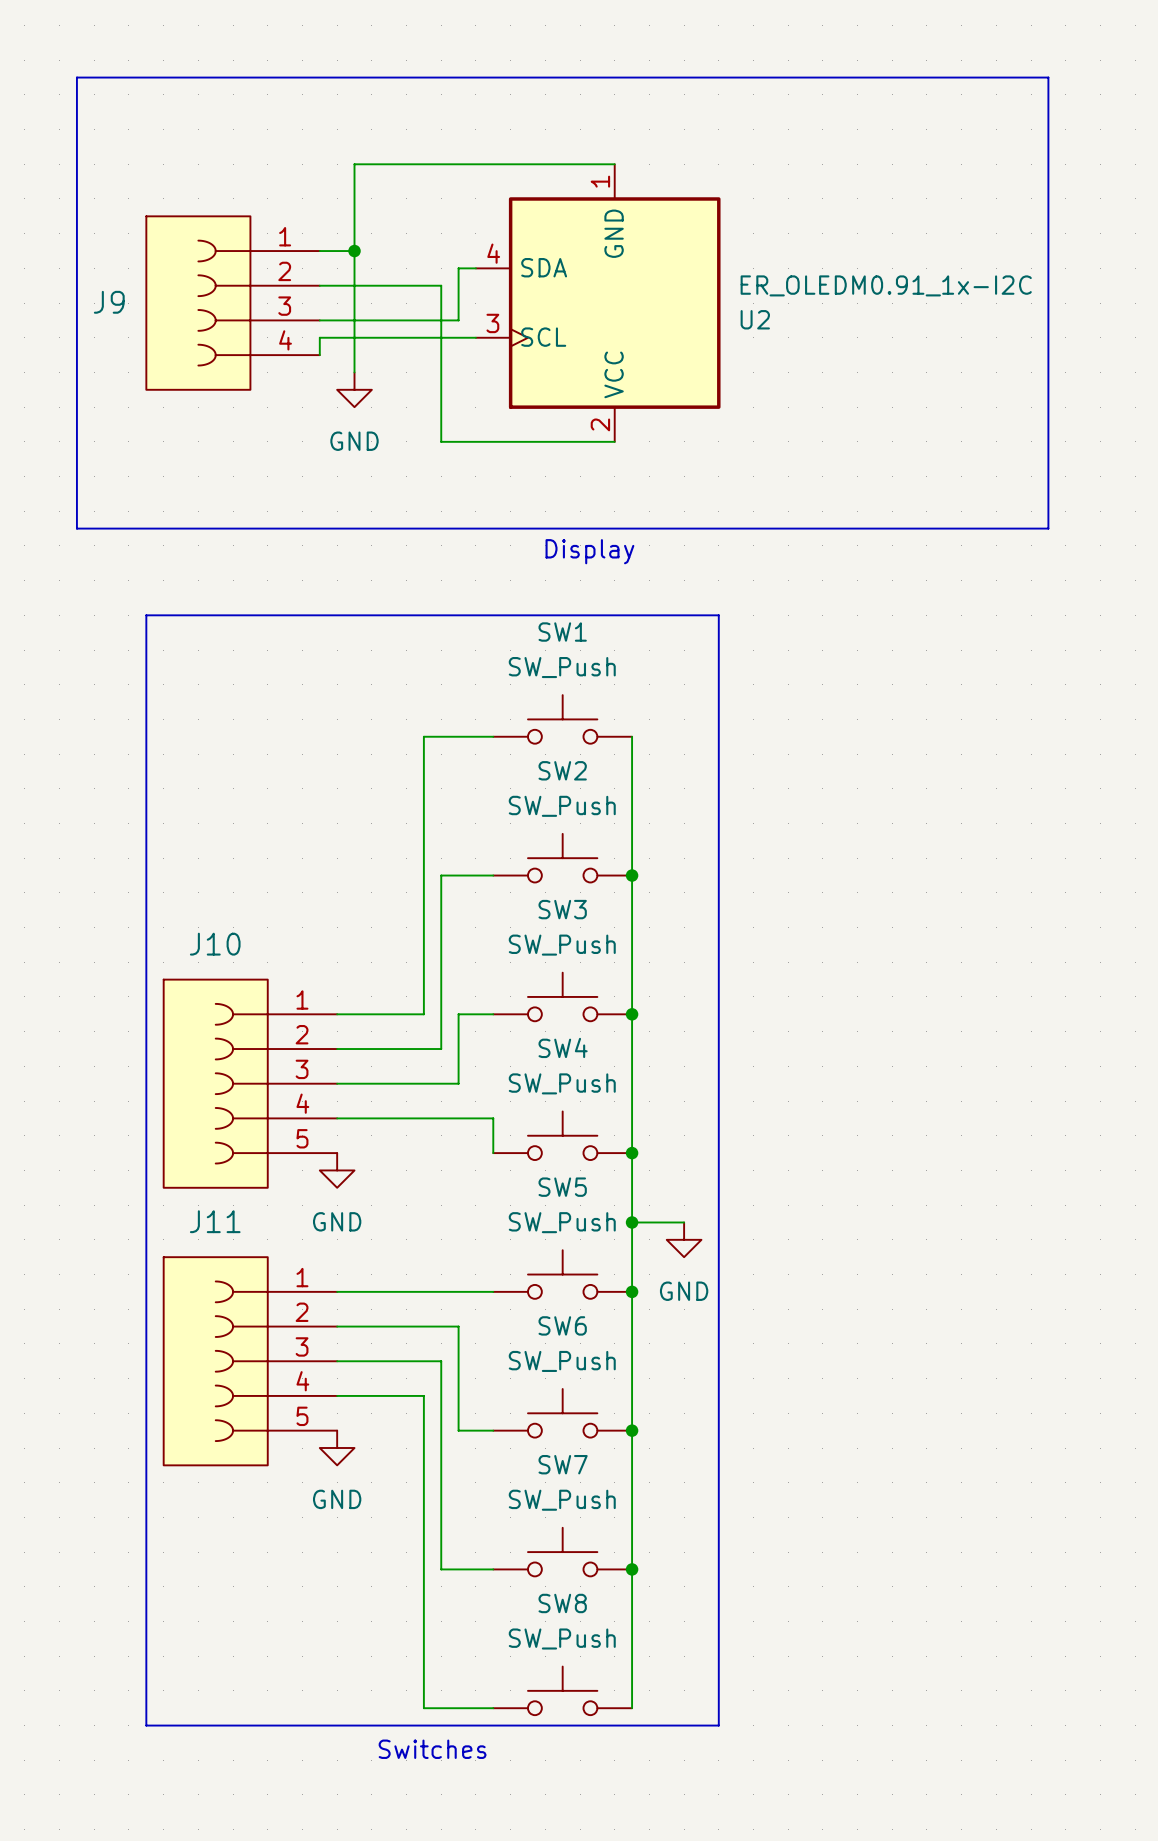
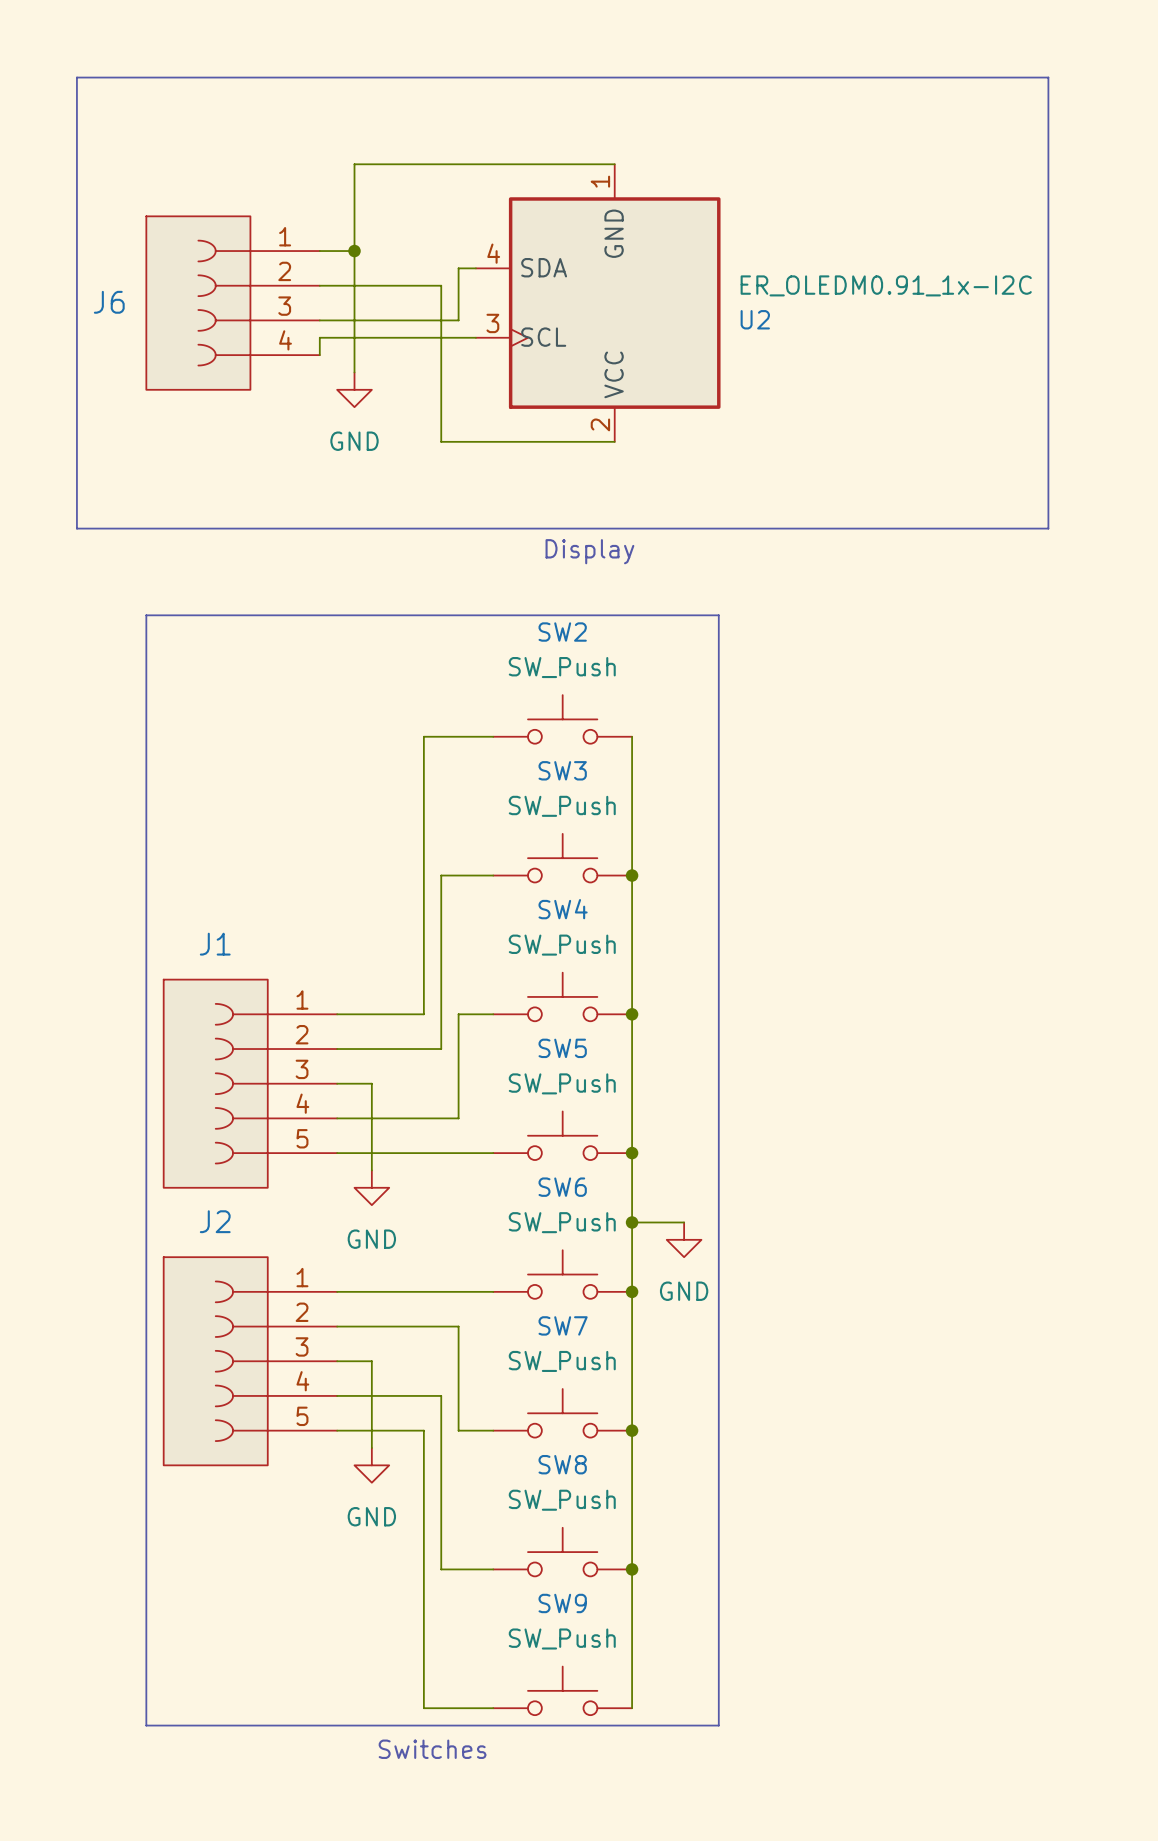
J9 name: J9 (109, 302) -> J6 (109, 302)
SW1 name: SW1 (562, 632) -> SW2 (562, 632)
SW2 name: SW2 (562, 770) -> SW3 (562, 770)
SW3 name: SW3 (562, 909) -> SW4 (563, 909)
J10 name: J10 (215, 944) -> J1 (215, 944)
SW4 name: SW4 (563, 1047) -> SW5 (562, 1048)
wire: (371, 1083) (458, 1083) -> (371, 1083) (371, 1170)
wire: (458, 1118) (493, 1118) (493, 1153) -> (458, 1118) (458, 1083)
wire: none -> (337, 1153) (493, 1153)
power symbol position: GND (337, 1170) -> GND (371, 1187)
SW5 name: SW5 (562, 1187) -> SW6 (562, 1187)
J11 name: J11 (215, 1221) -> J2 (215, 1221)
SW6 name: SW6 (562, 1325) -> SW7 (563, 1325)
wire: (371, 1361) (441, 1361) (441, 1395) -> (371, 1361) (371, 1448)
wire: (423, 1395) (423, 1430) -> (423, 1395) (441, 1395)
wire: none -> (337, 1430) (423, 1430)
power symbol position: GND (337, 1448) -> GND (371, 1465)
SW7 name: SW7 (563, 1464) -> SW8 (562, 1464)
SW8 name: SW8 (562, 1603) -> SW9 (562, 1603)

